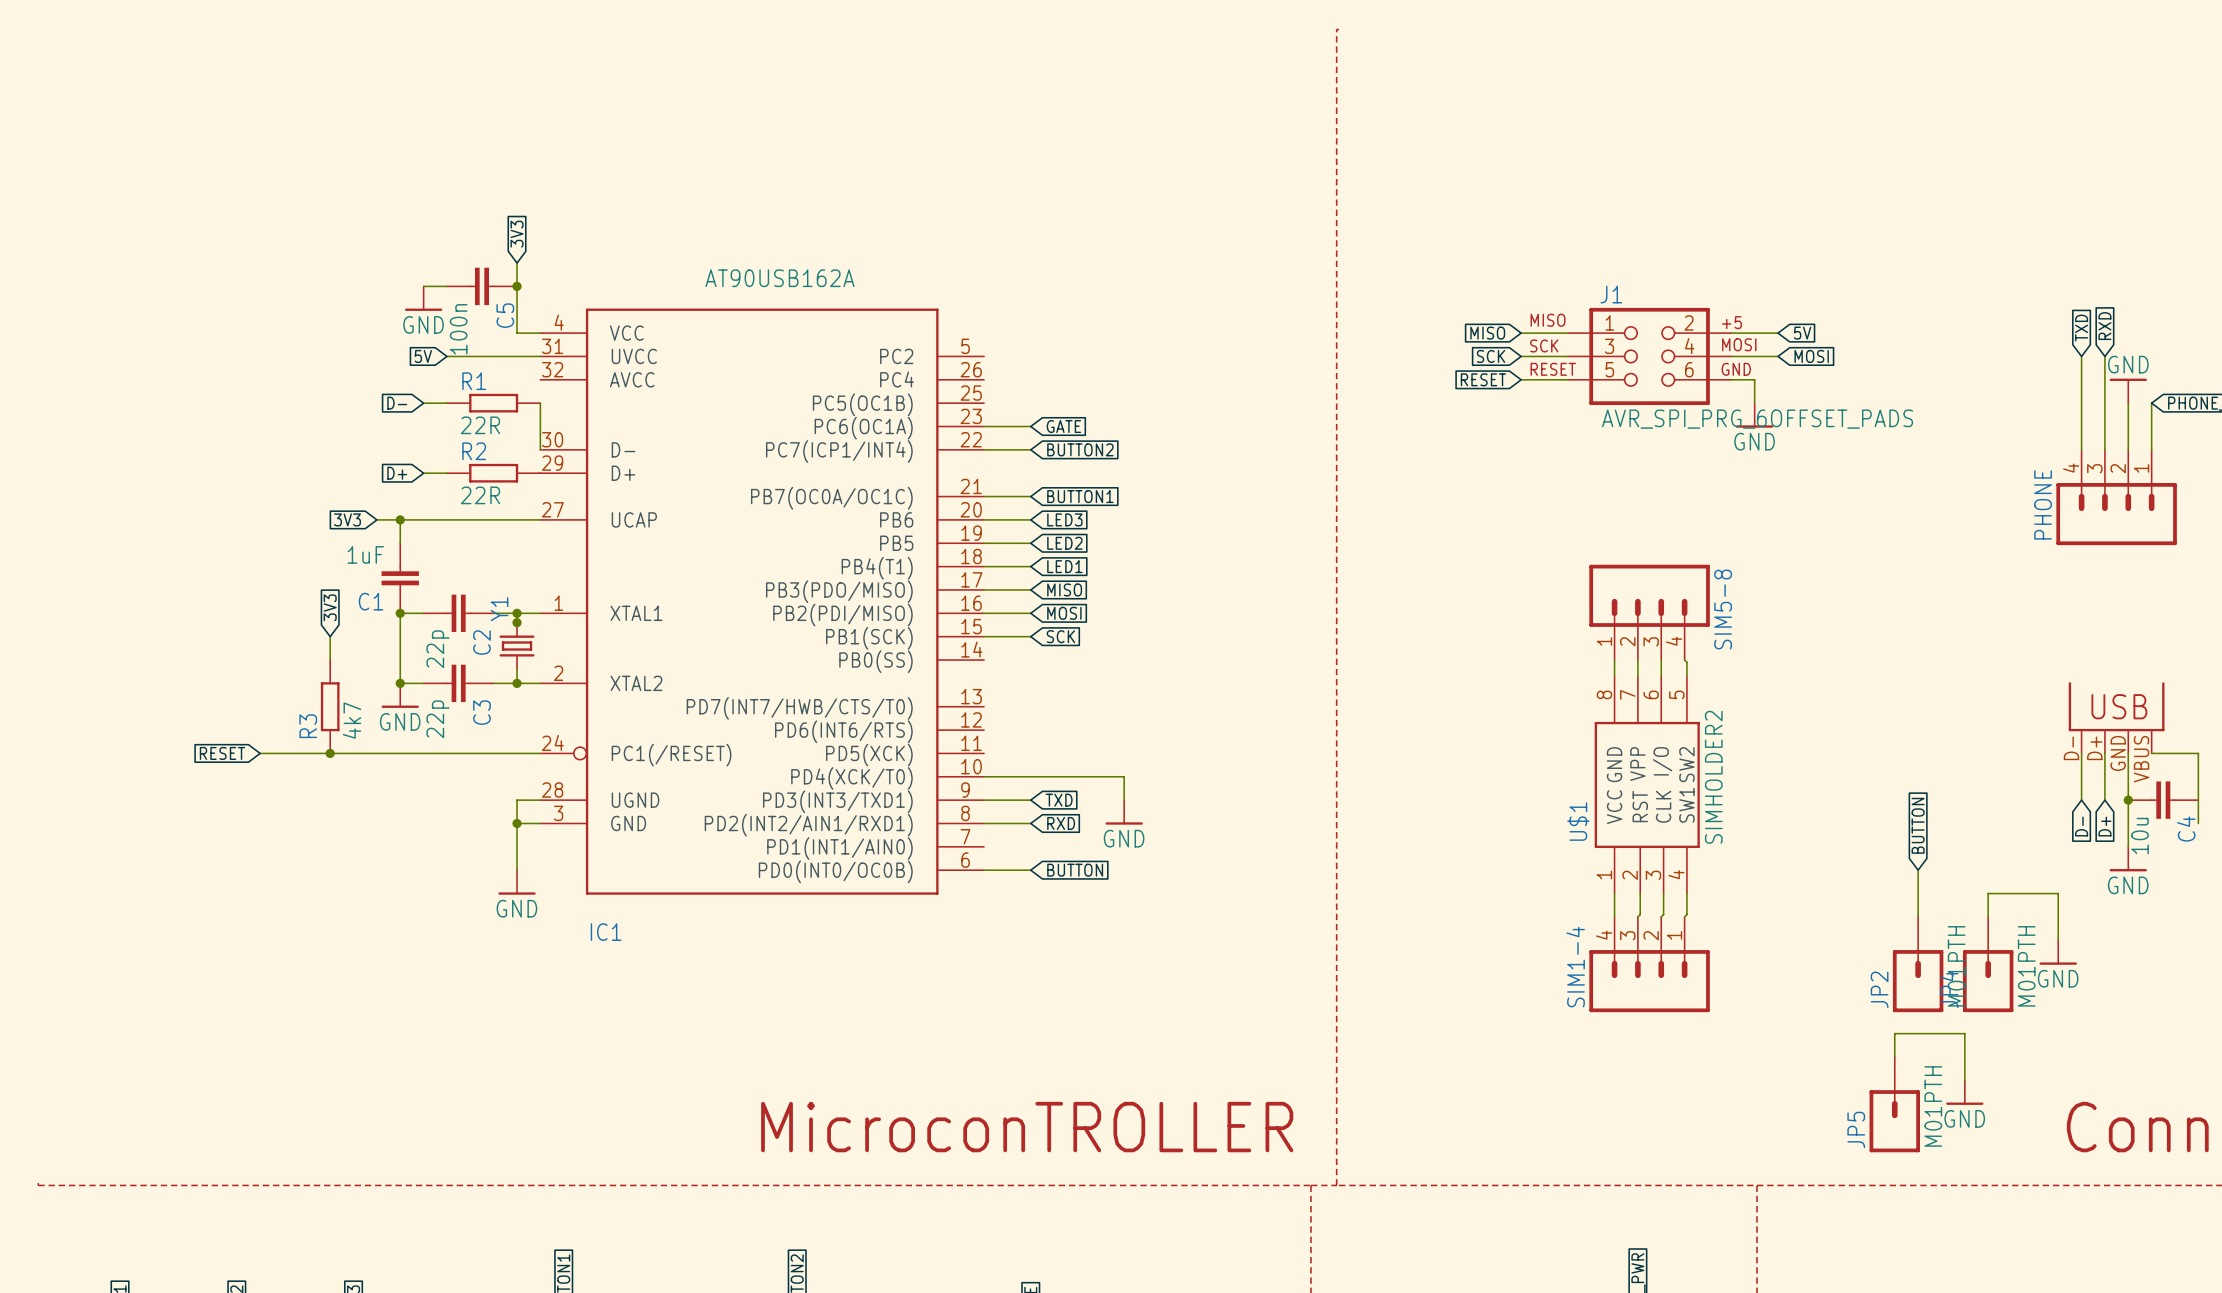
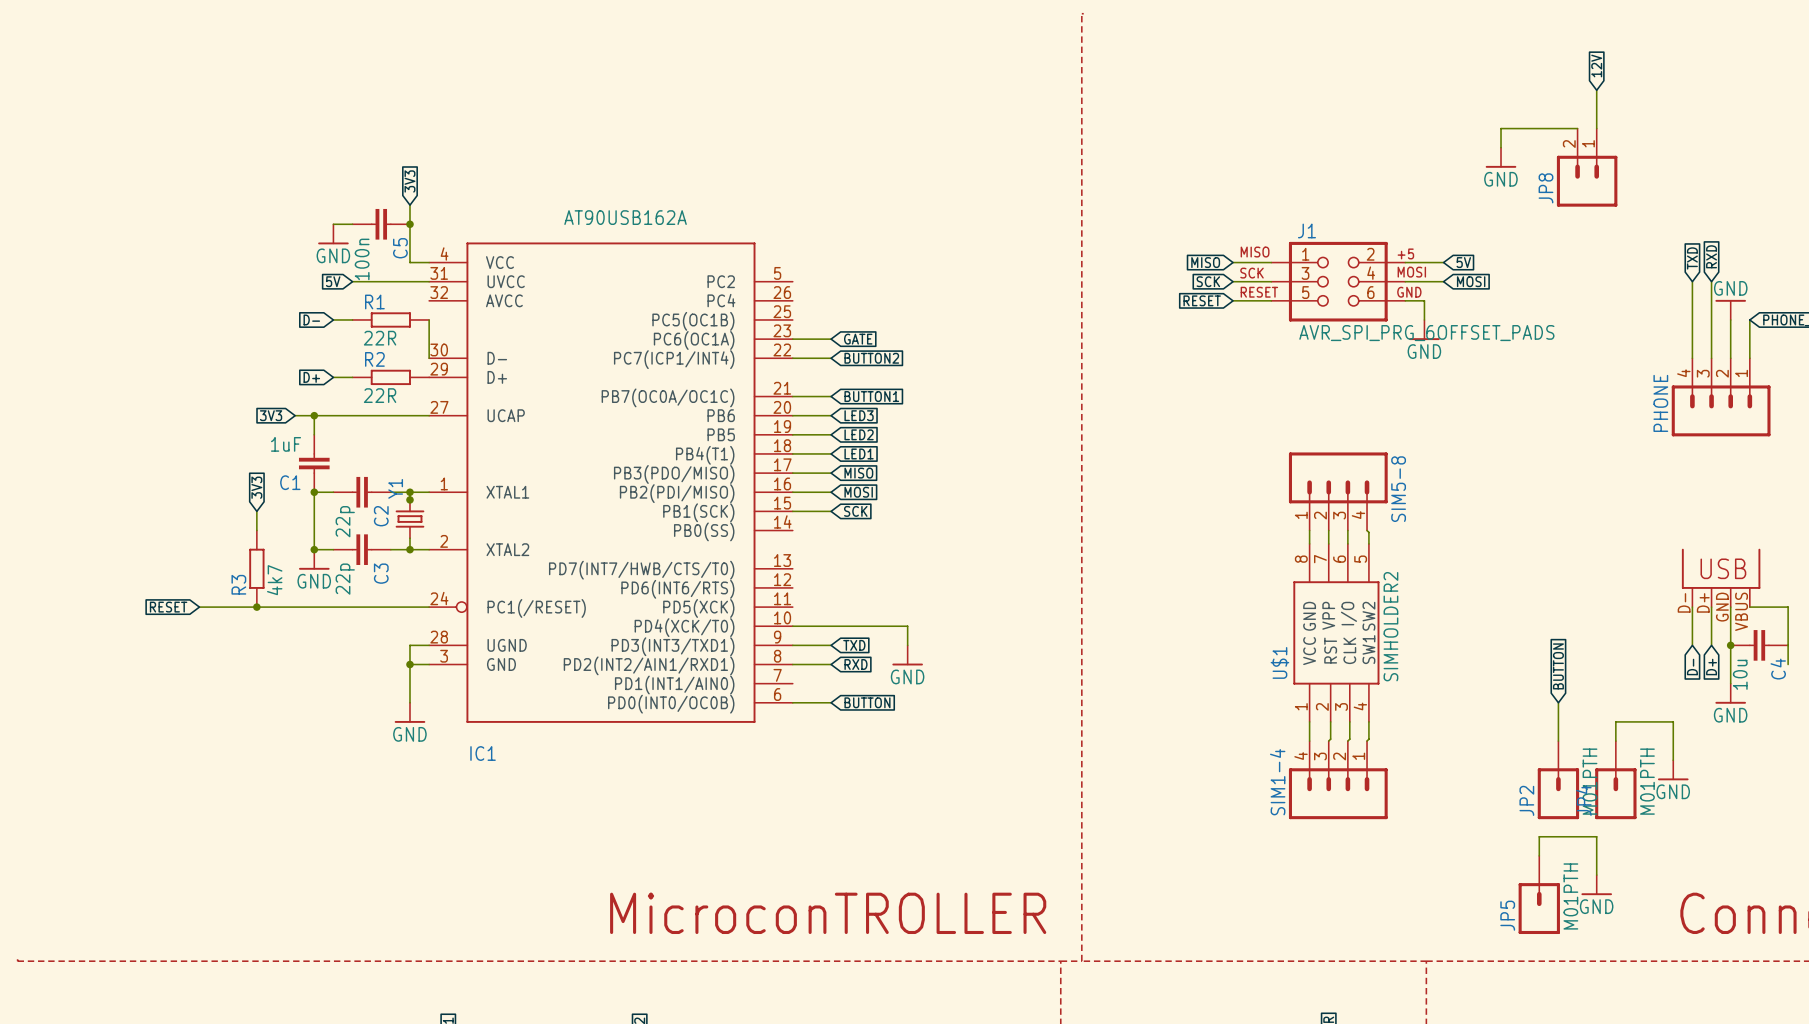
global label: none -> 12V (1596, 66)
wire: none -> (1596, 90) (1596, 128)
wire: none -> (1577, 128) (1501, 128) (1501, 147)
power symbol: none -> GND (1501, 157)
JP8: none -> (1587, 167)

